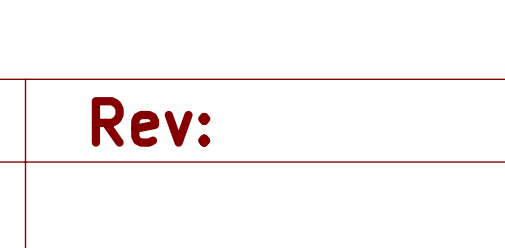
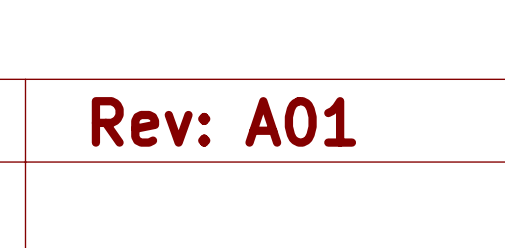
title block: Rev: (151, 121) -> Rev: A01 (223, 121)

